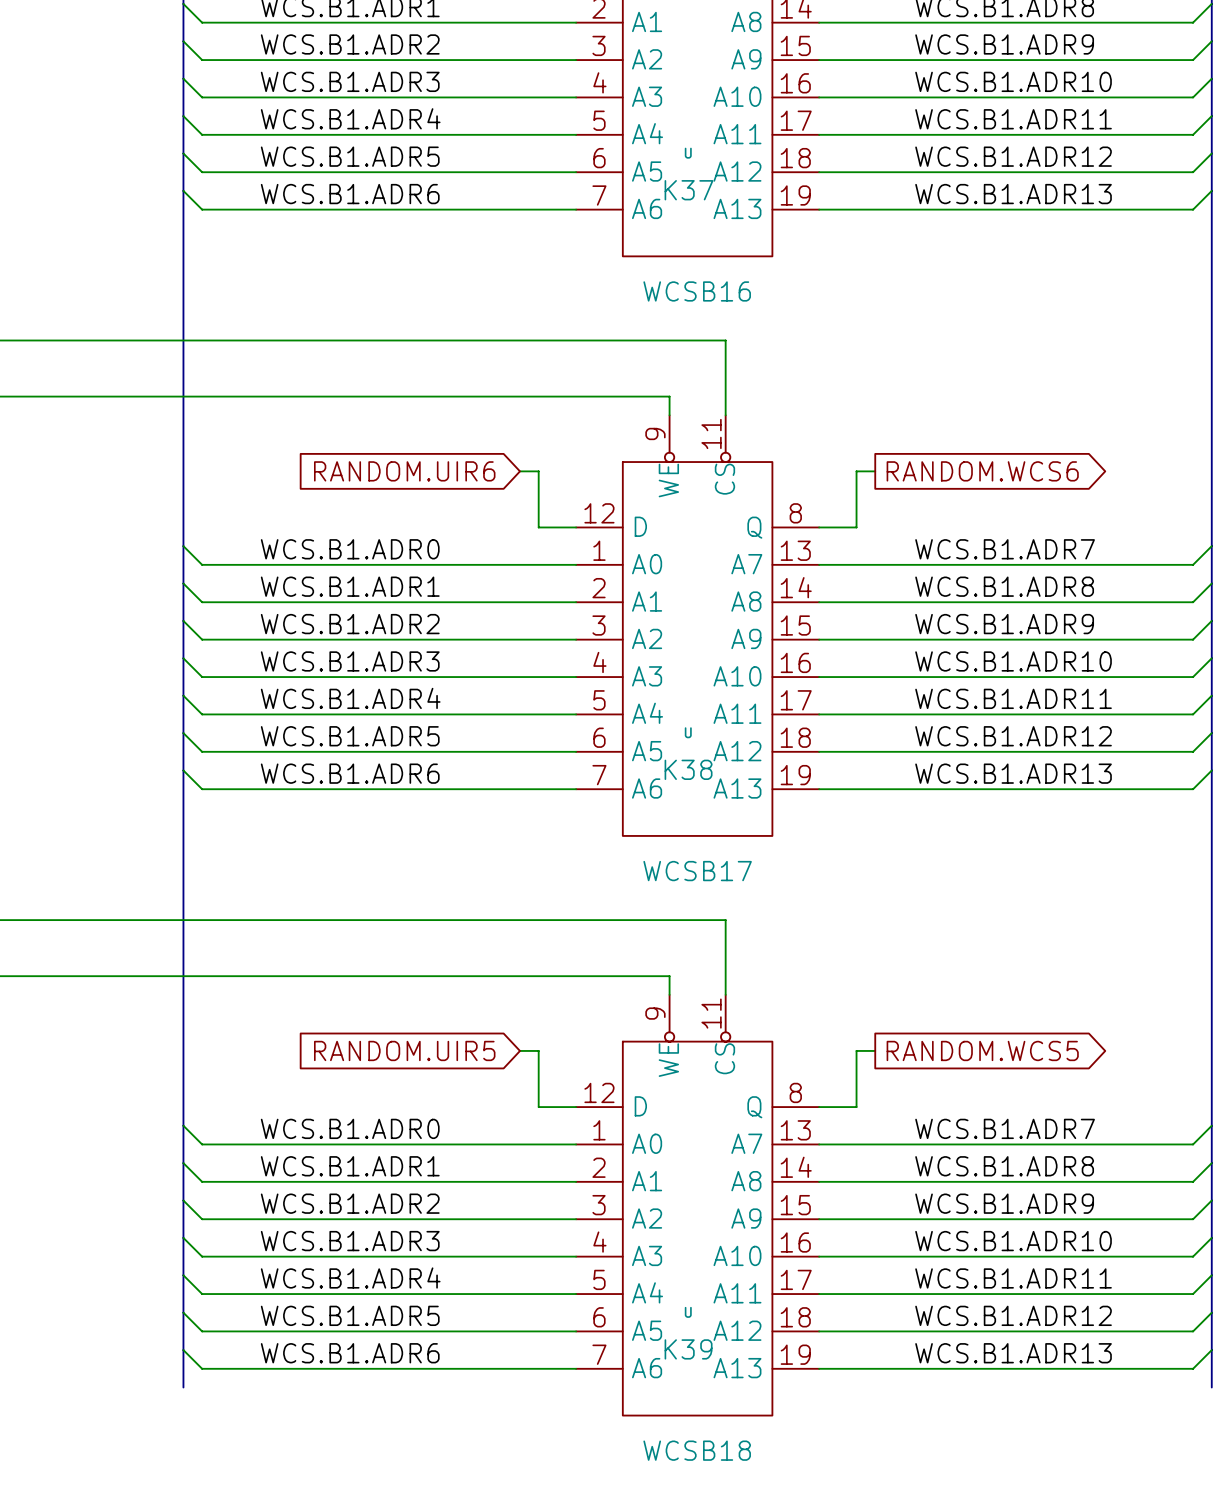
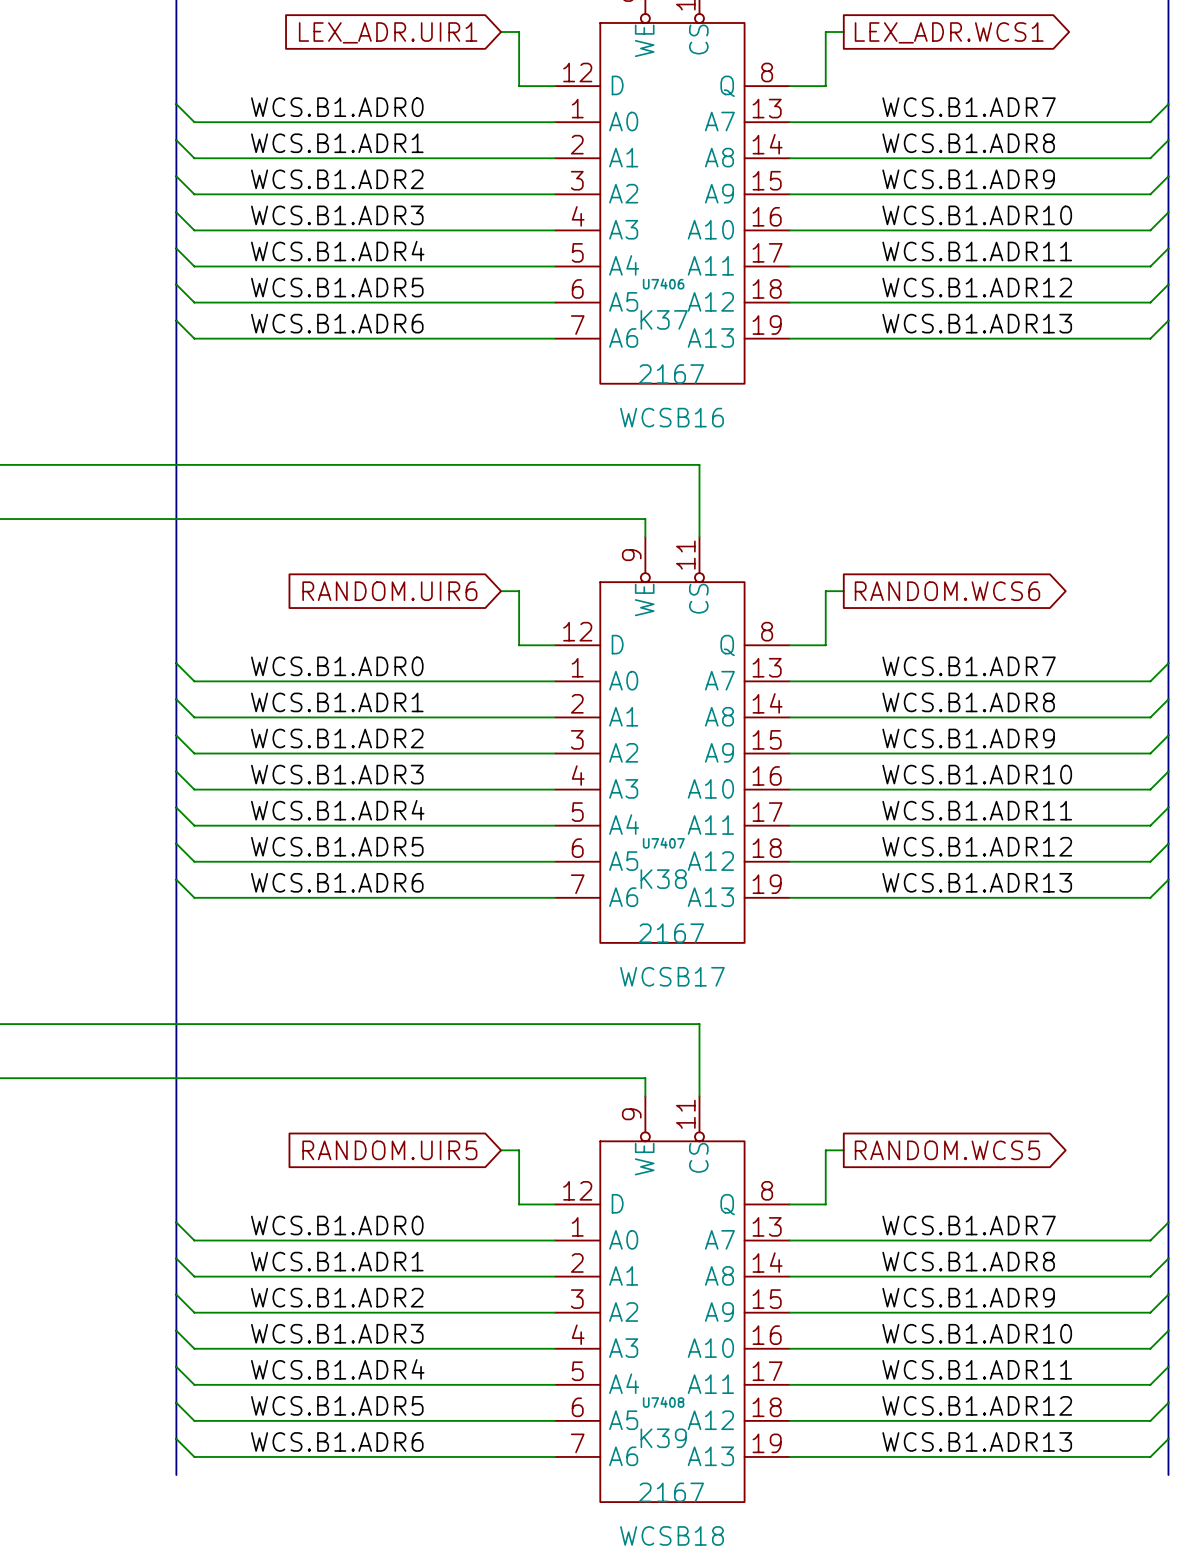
U name: U (688, 153) -> U7406 (663, 283)
U value: none -> 2167 (671, 374)
U name: U (688, 732) -> U7407 (663, 843)
U value: none -> 2167 (671, 933)
U name: U (688, 1312) -> U7408 (663, 1402)
U value: none -> 2167 (671, 1492)

